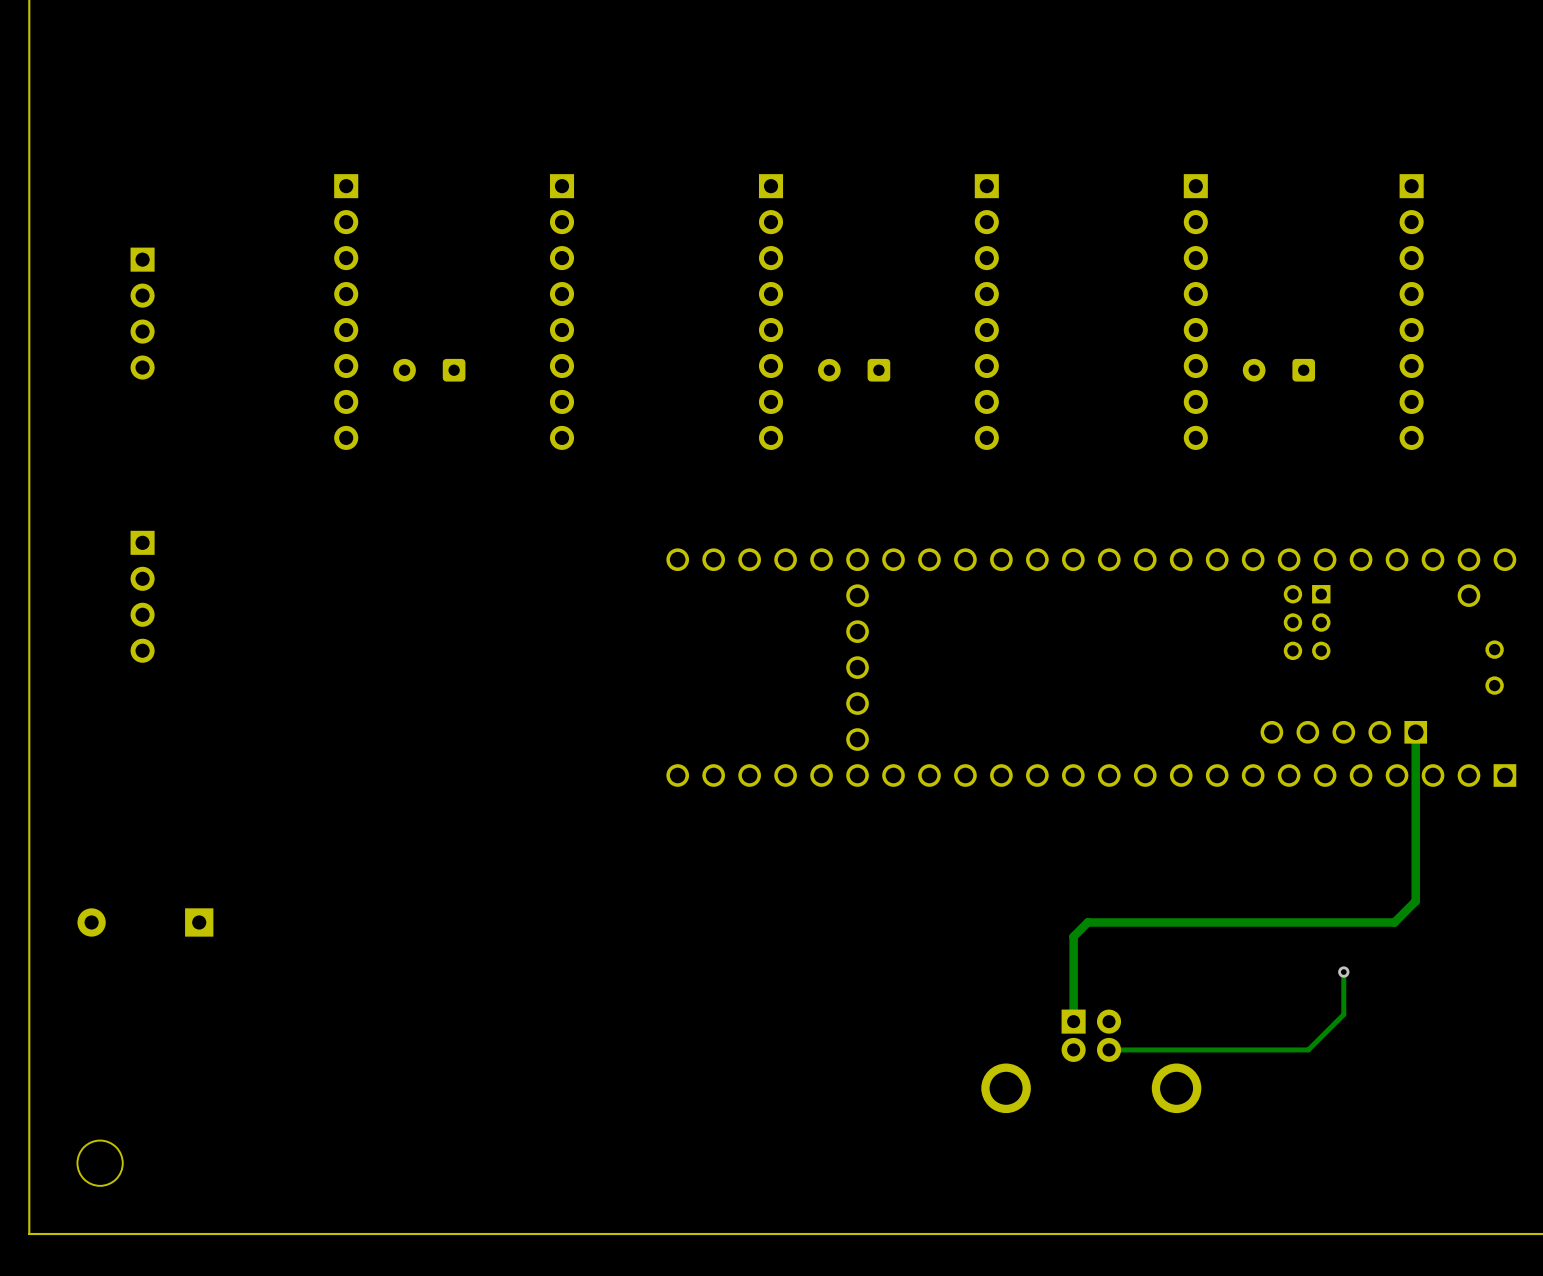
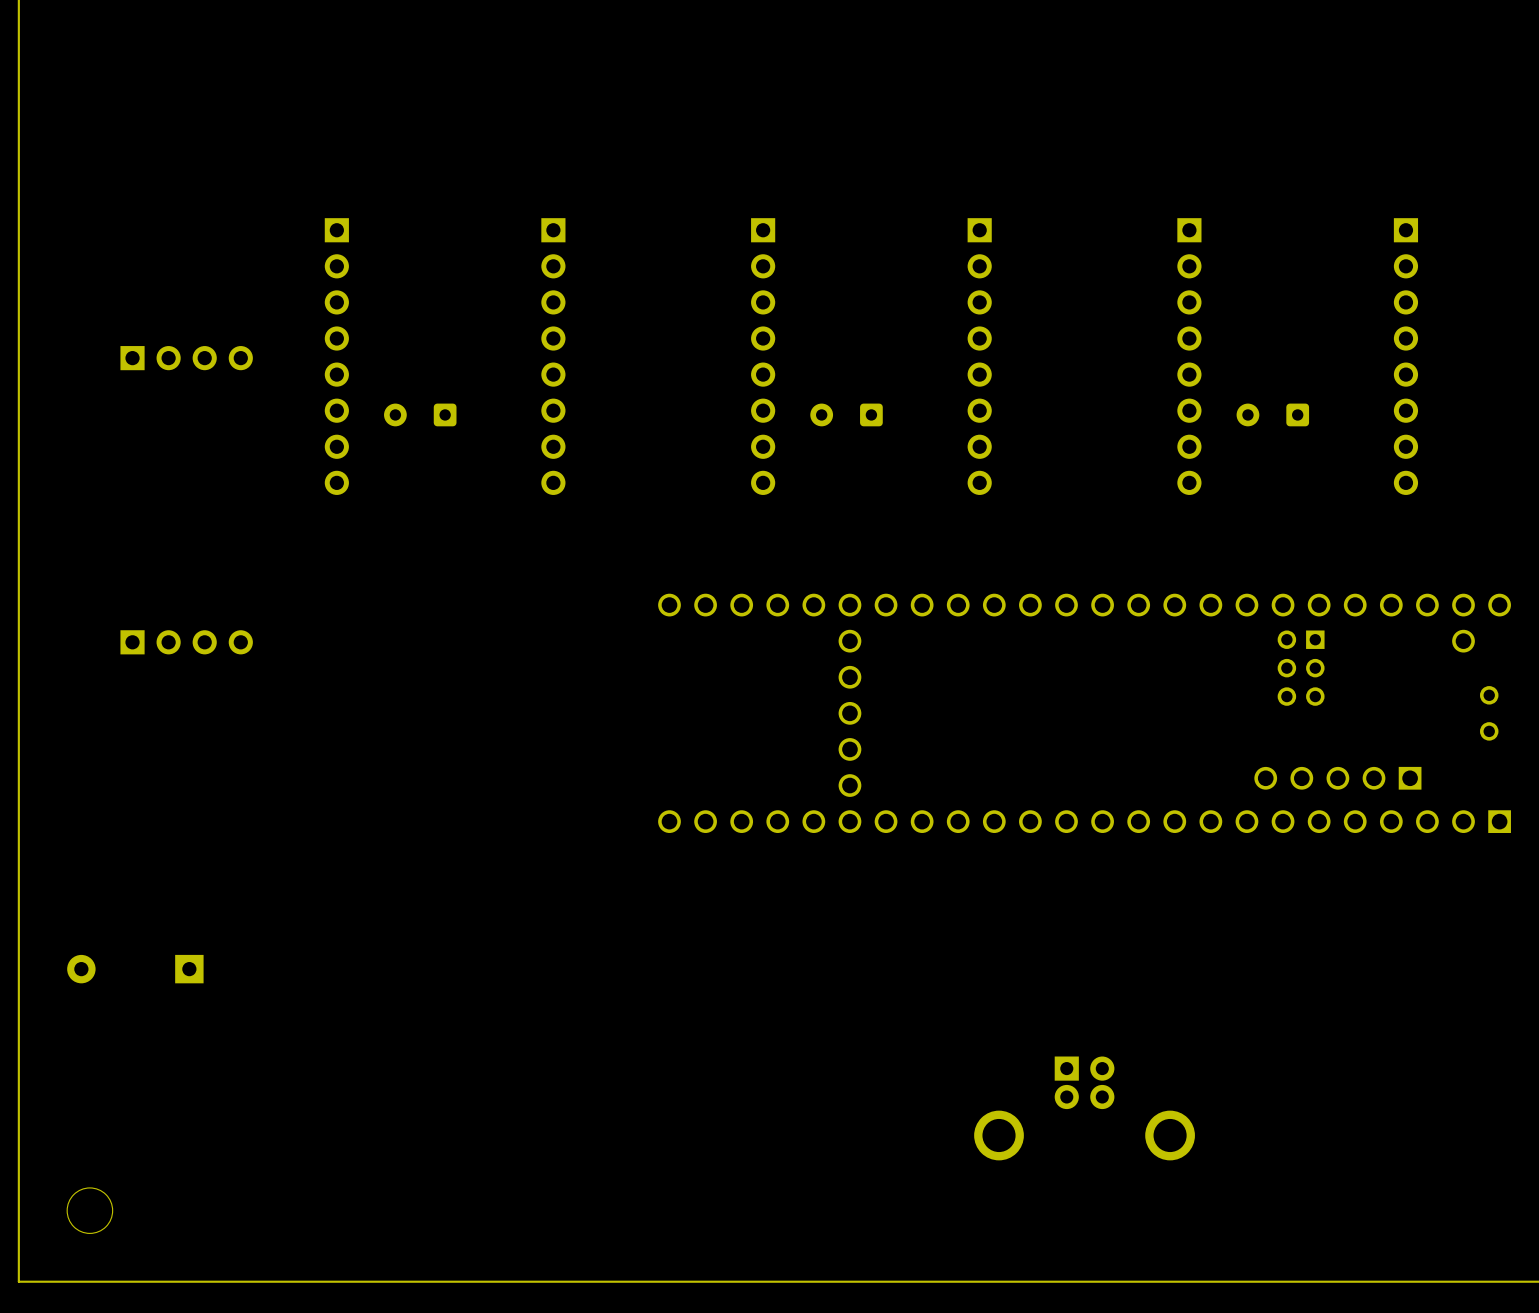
part rotation: 0° (142, 313) -> 90° counterclockwise (186, 358)
part rotation: 0° (142, 596) -> 90° counterclockwise (186, 642)
track: (1415, 732) (1415, 901) (1394, 922) (1087, 922) (1073, 936) (1073, 1021) -> none
track: (1343, 972) (1343, 1014) (1308, 1049) (1109, 1049) -> none
via: (1343, 972) -> none

